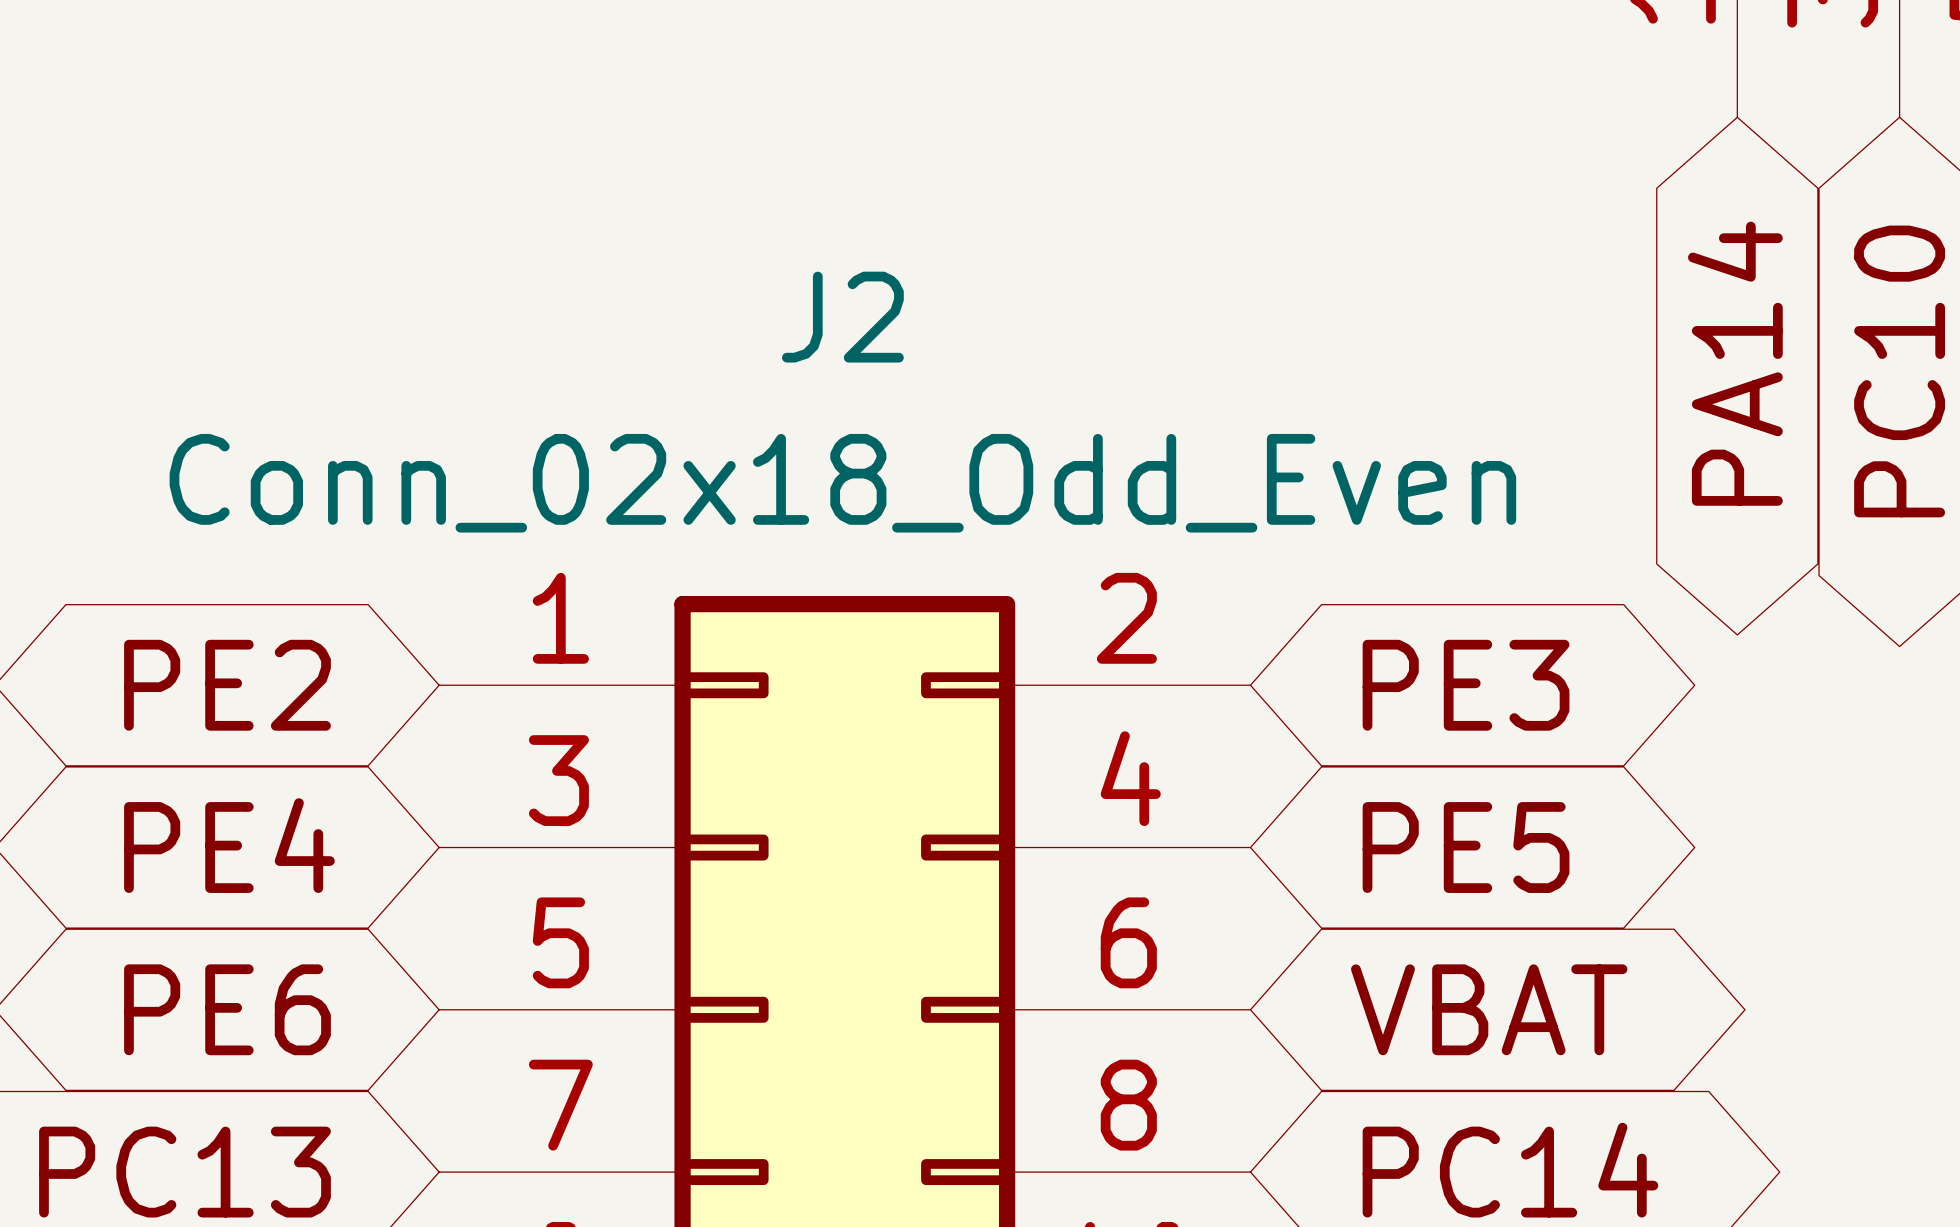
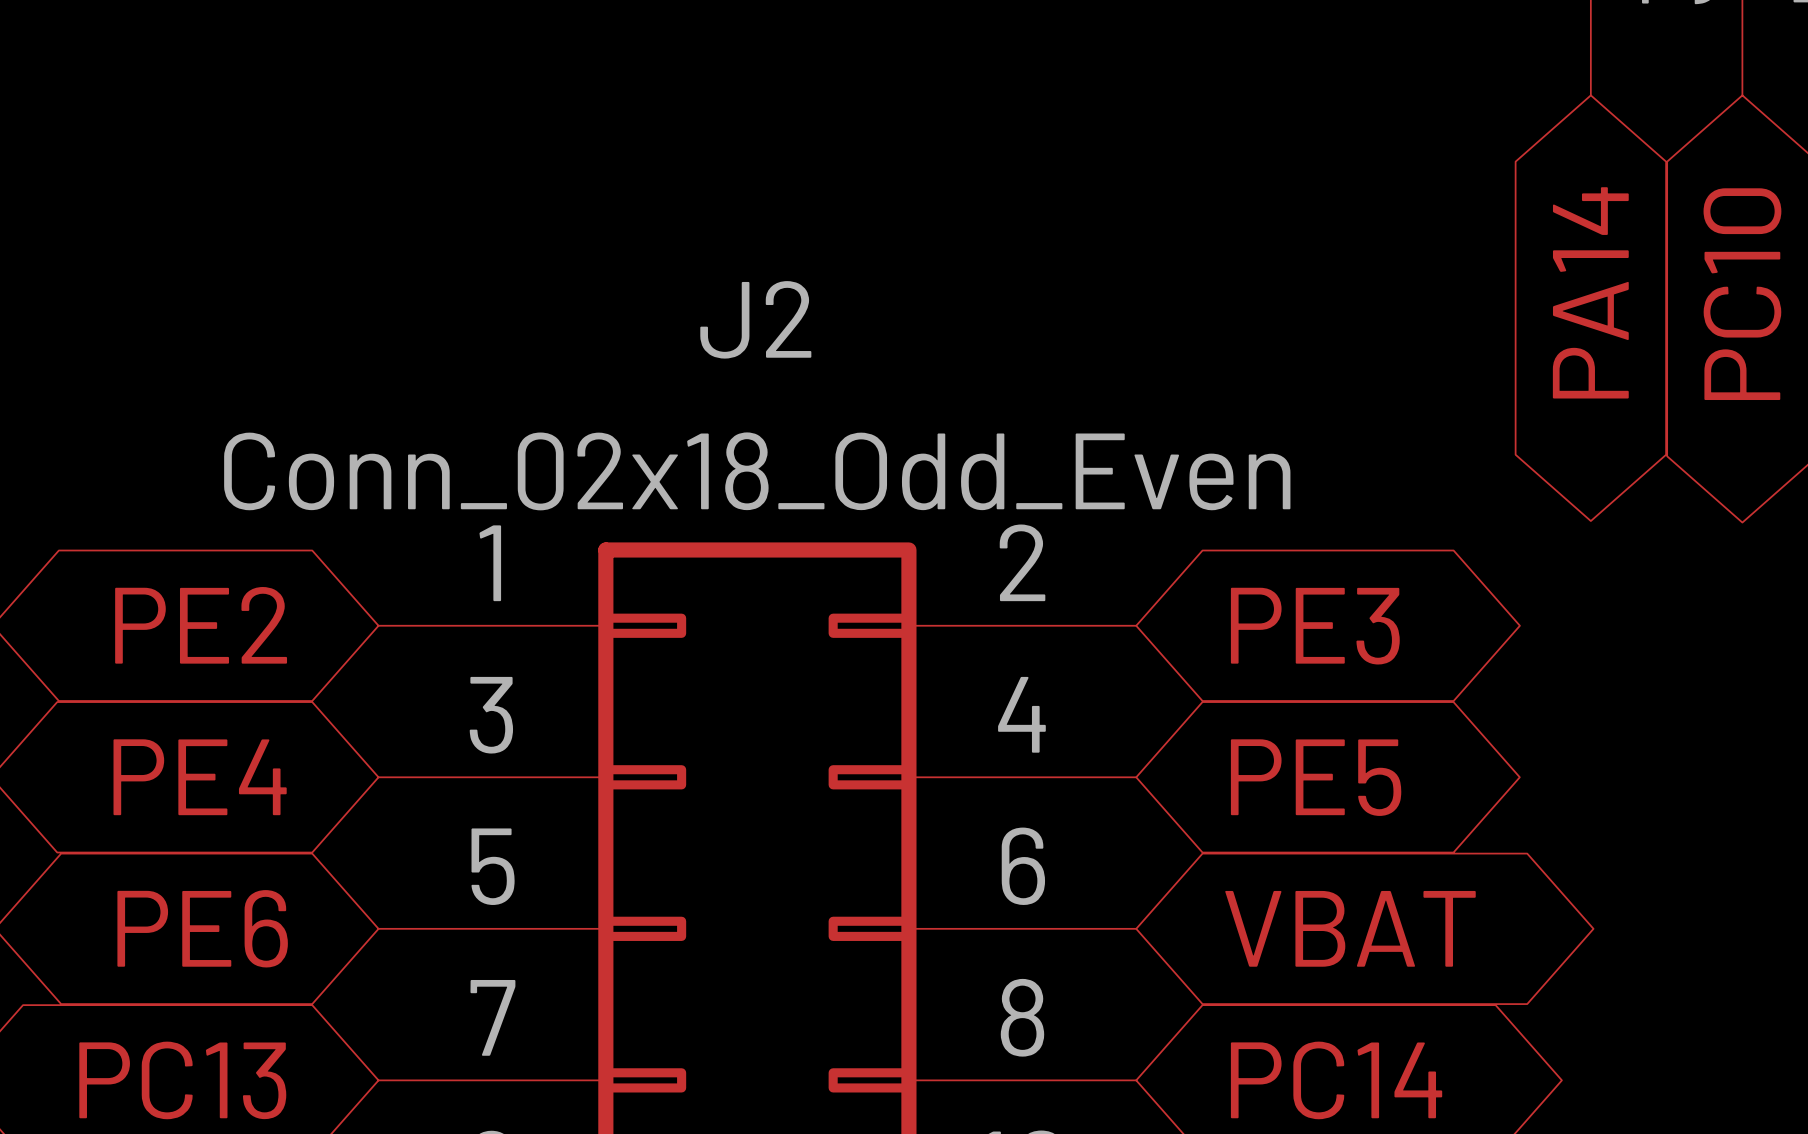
J2 name position: J2 (842, 317) -> J2 (755, 319)
J2 value position: Conn_02x18_Odd_Even (842, 483) -> Conn_02x18_Odd_Even (757, 471)

